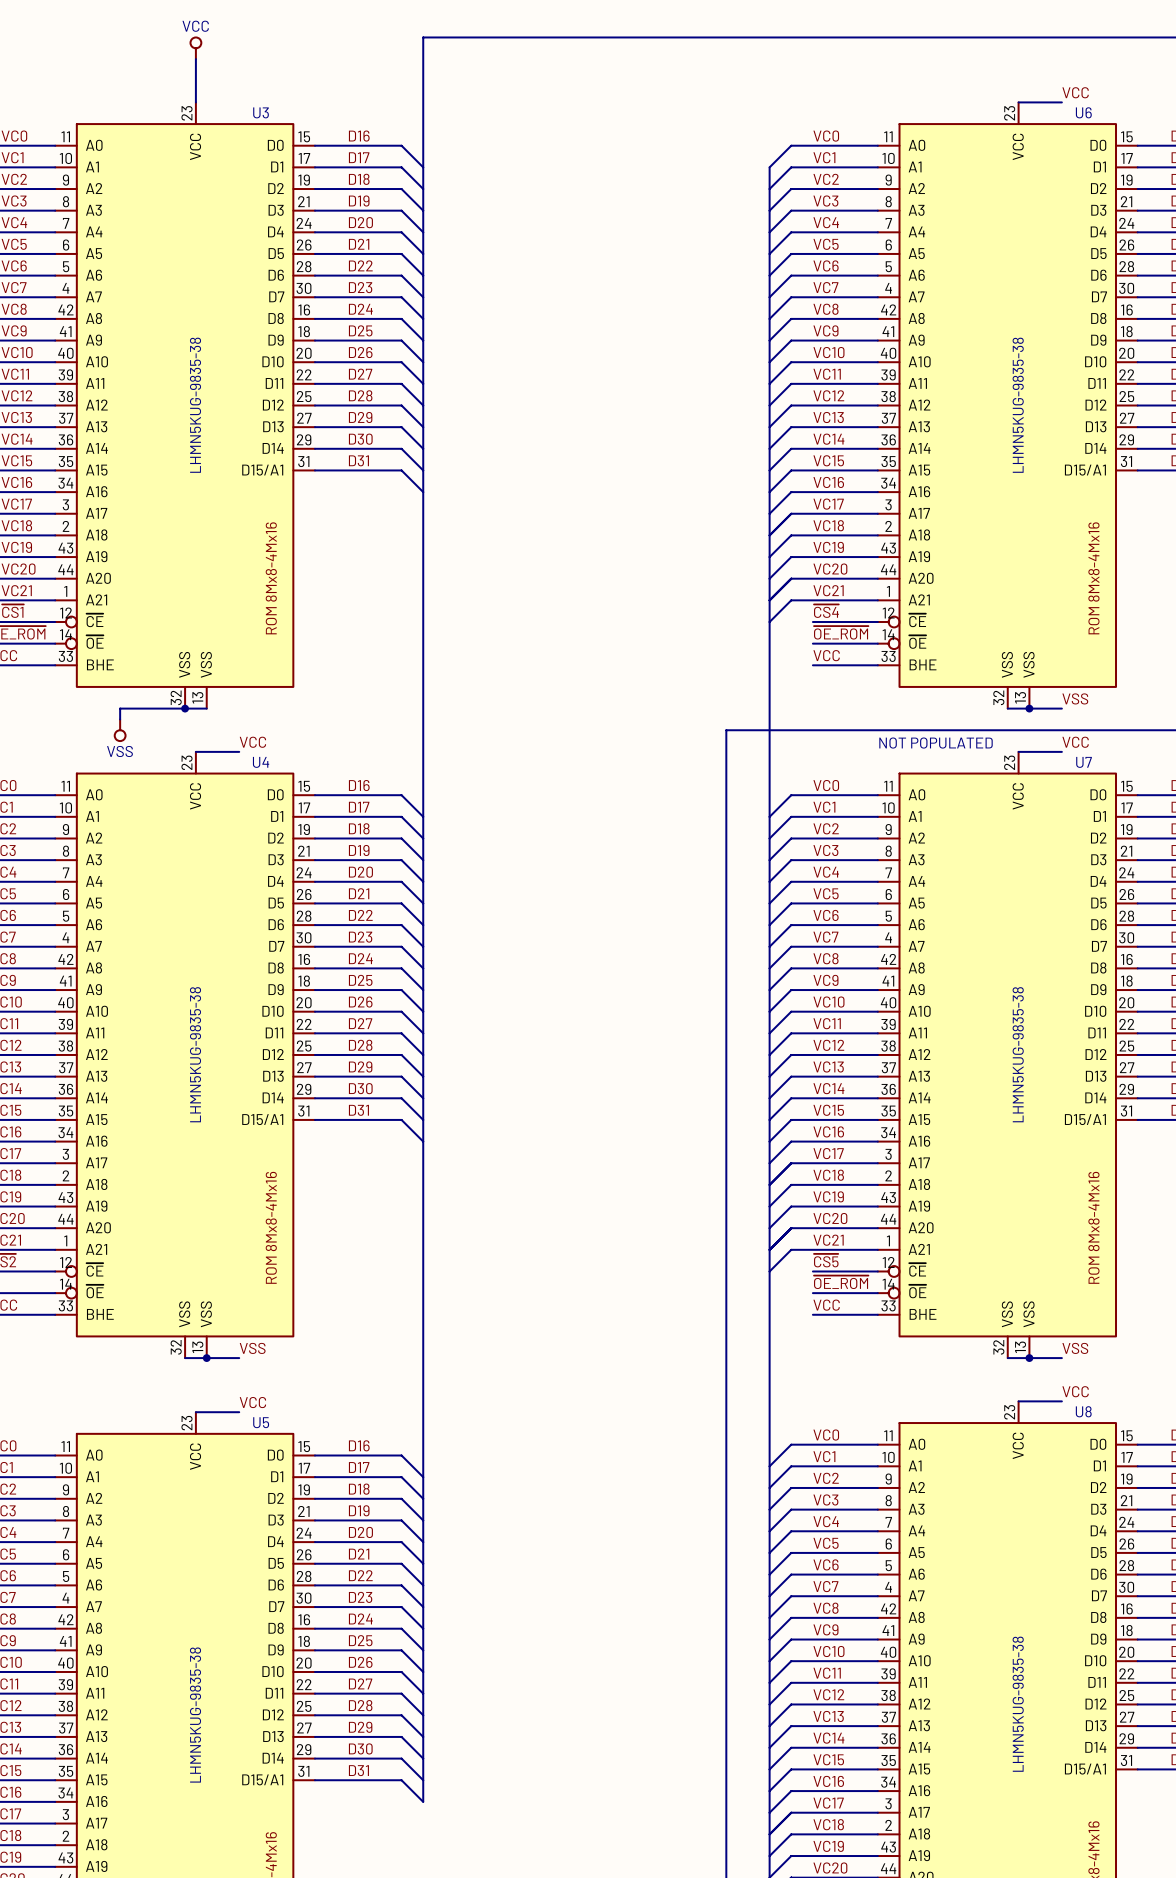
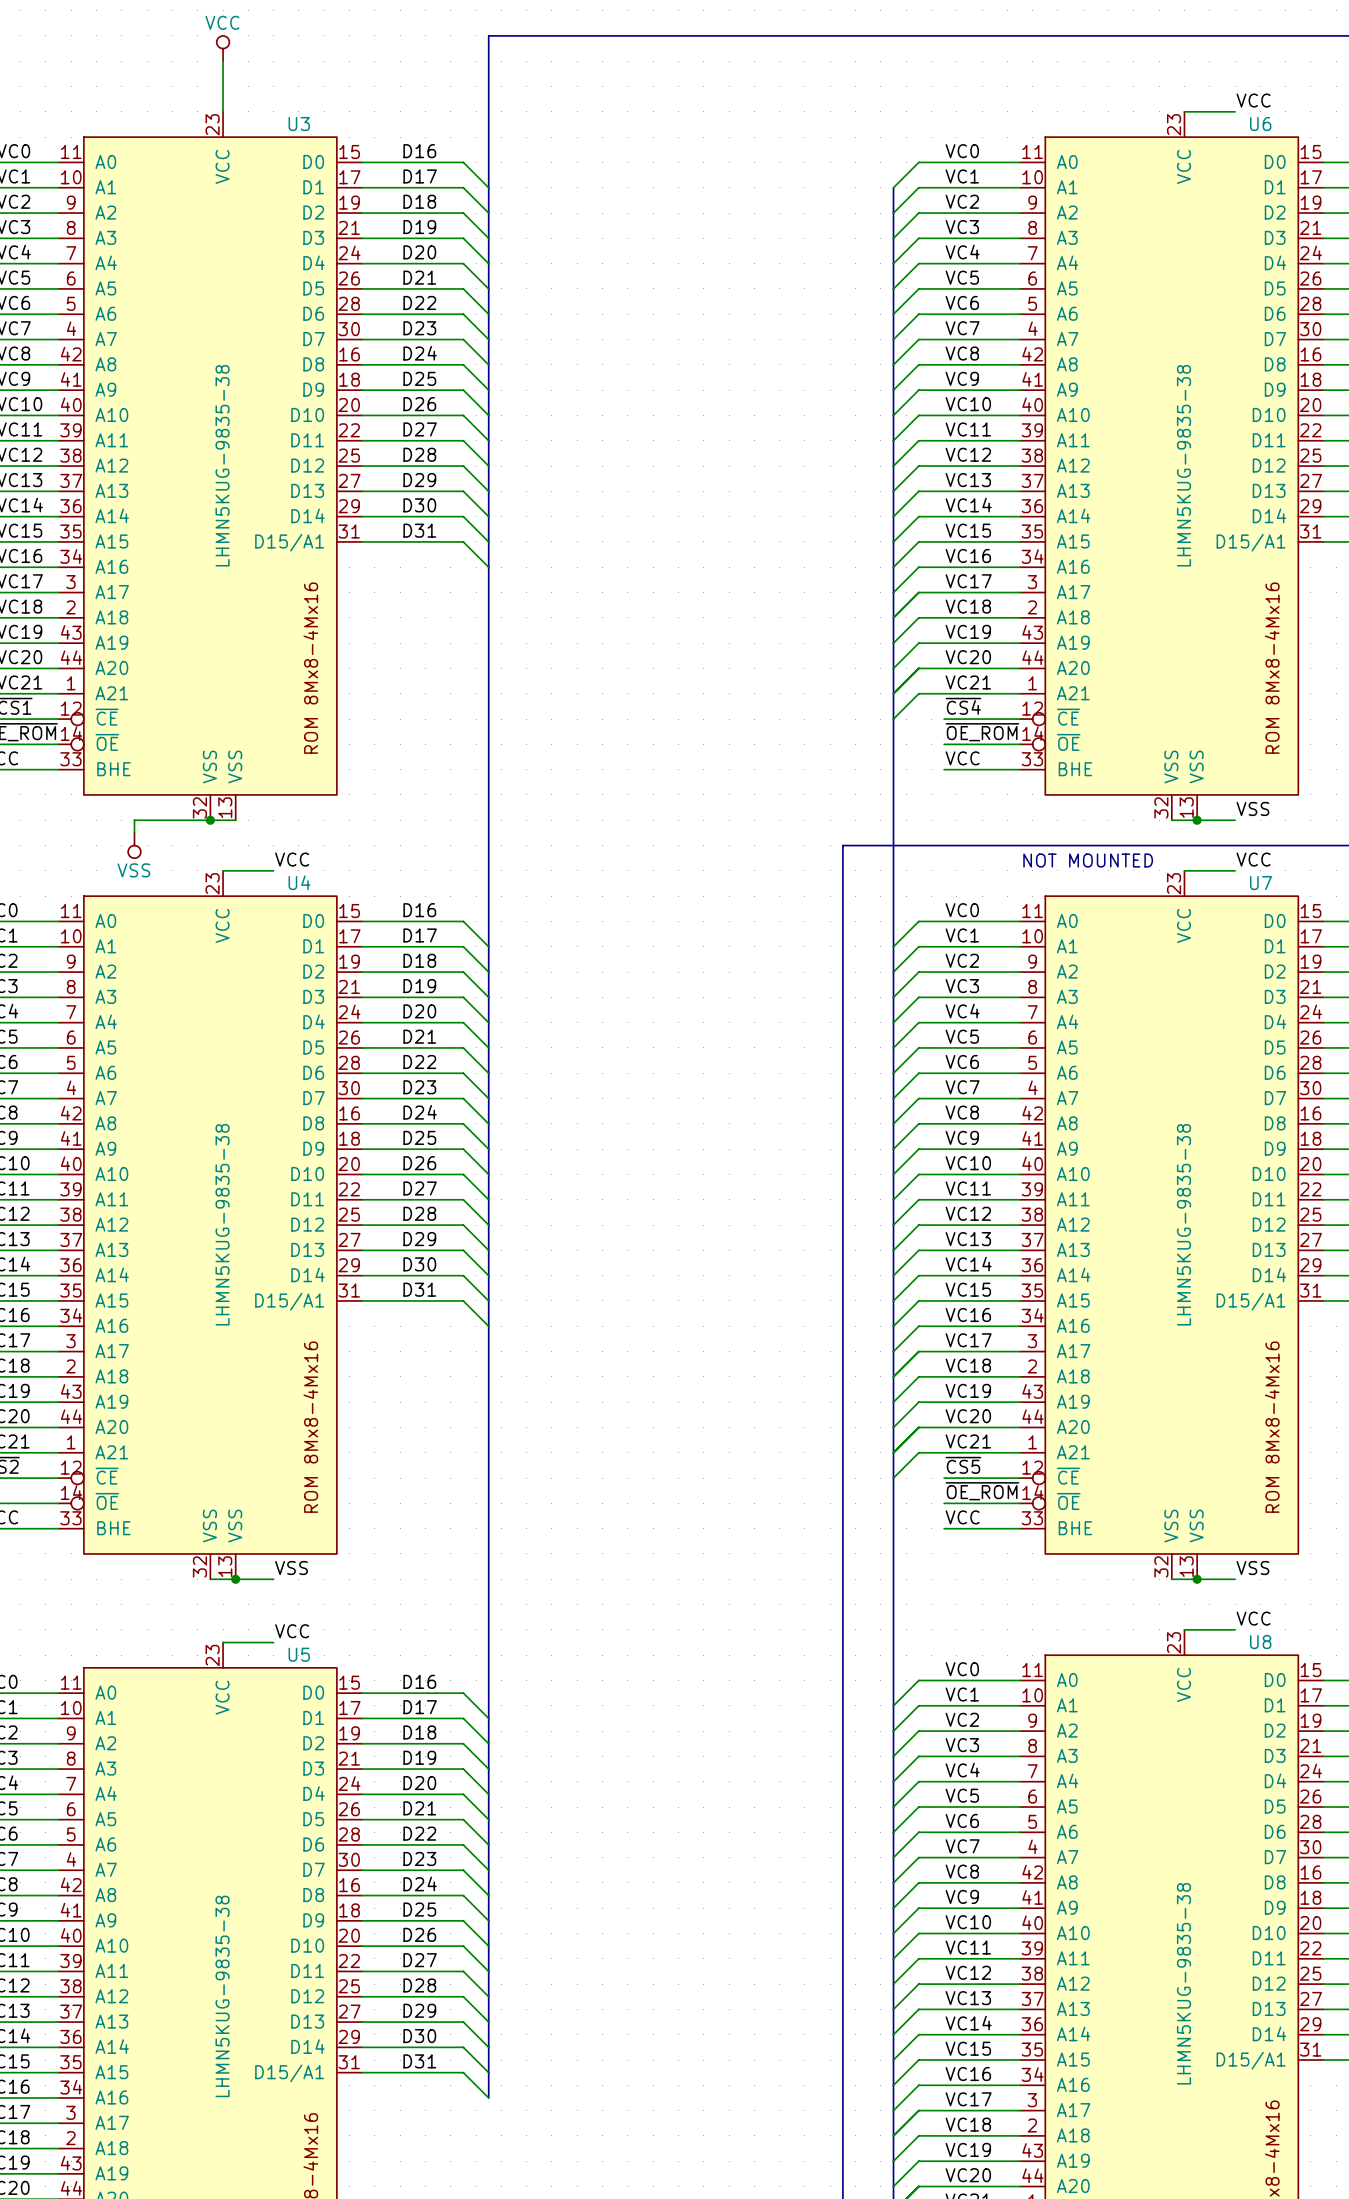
text: NOT POPULATED (936, 743) -> NOT MOUNTED (1088, 860)

